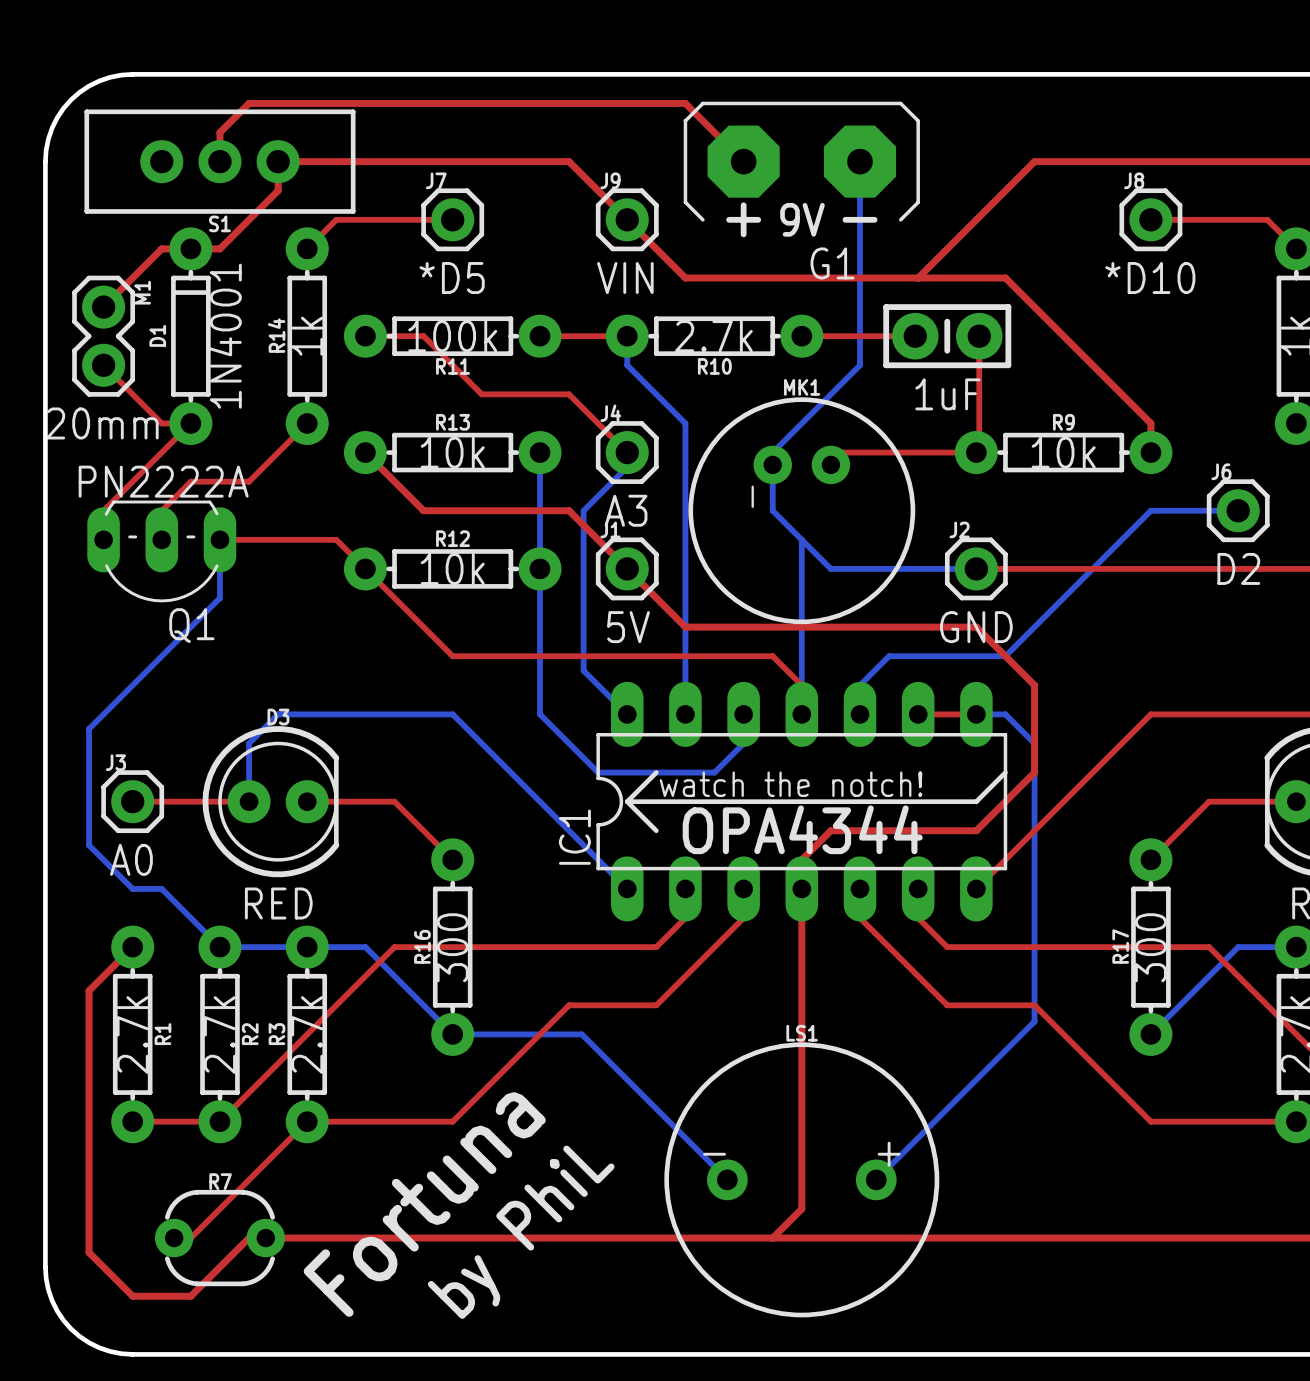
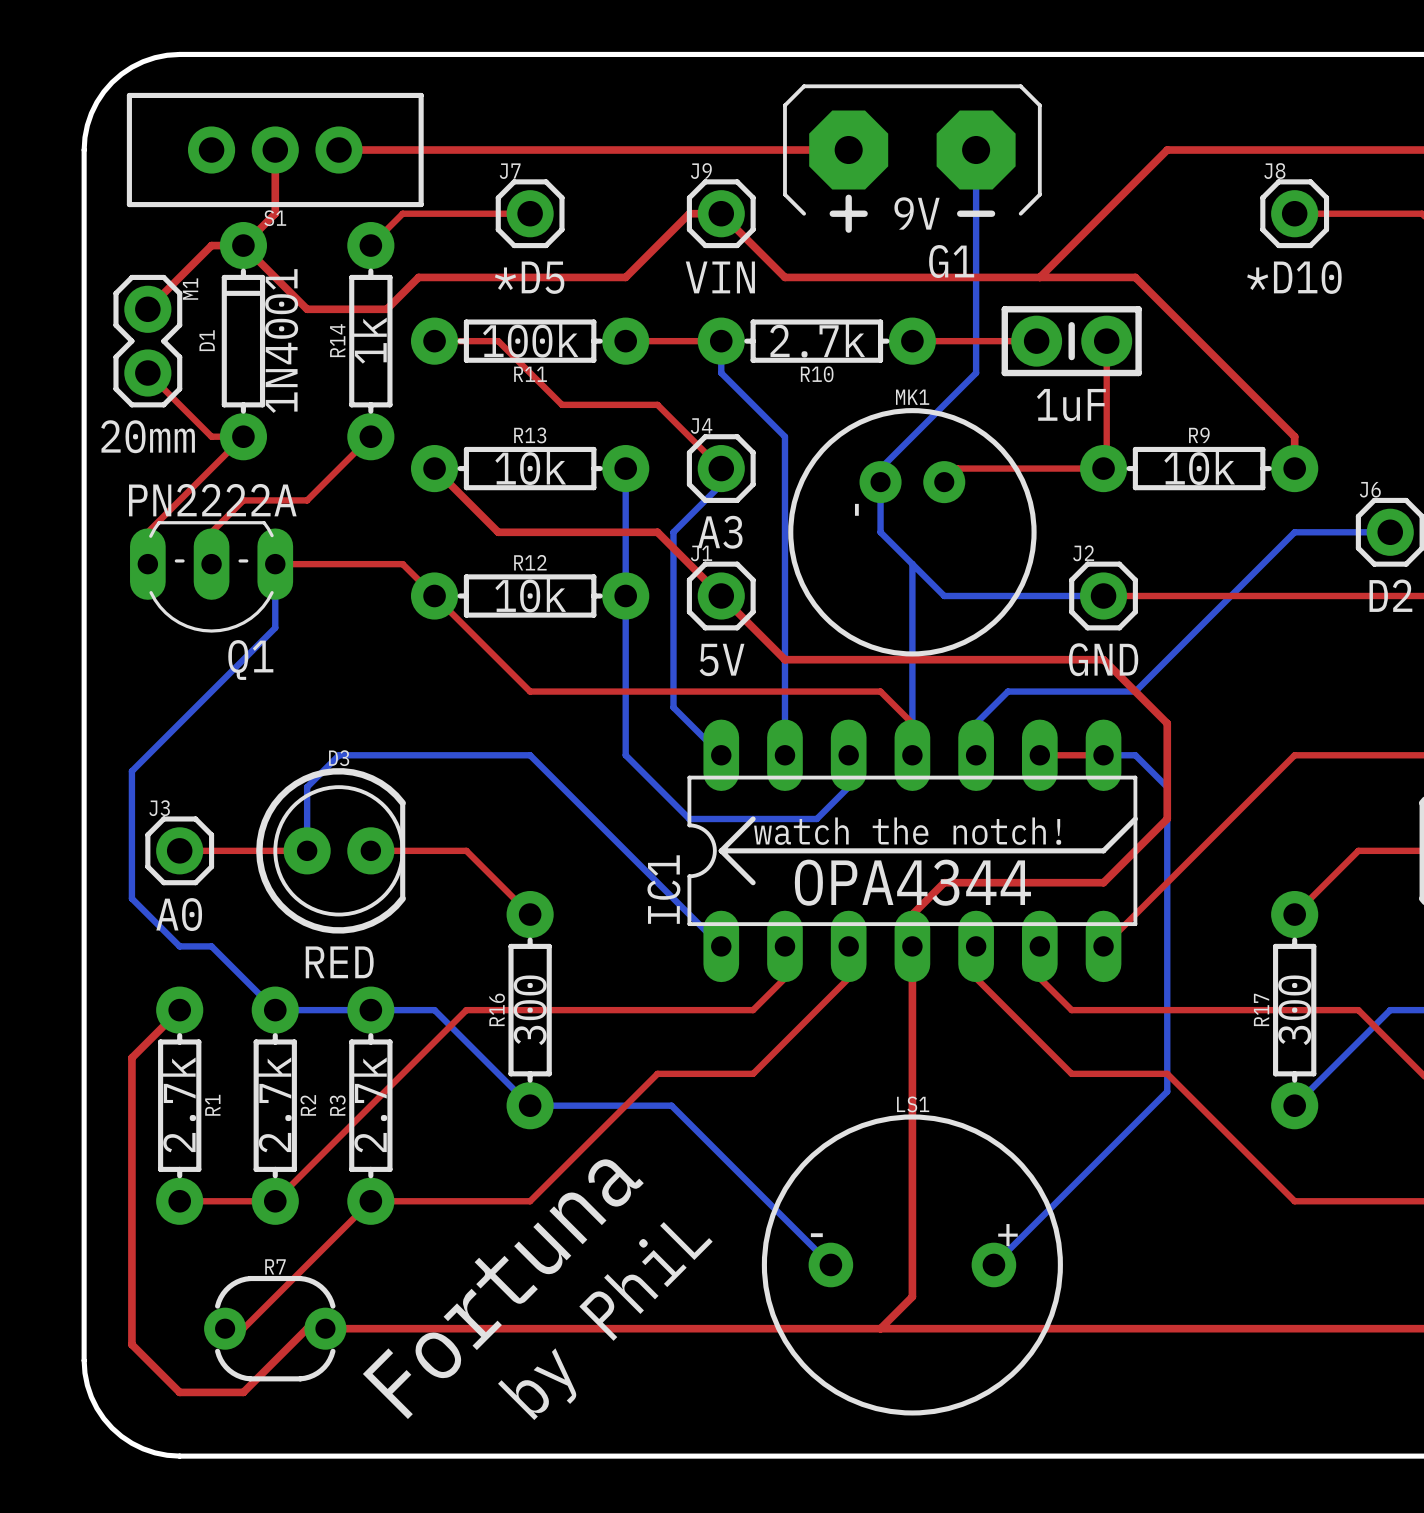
top track: (219, 161) (219, 132) (249, 103) (685, 103) (743, 161) -> (275, 150) (275, 213) (243, 245) (307, 309) (386, 309) (418, 277) (625, 277) (689, 213) (721, 213)
top track: (278, 161) (278, 190) (219, 248) (190, 248) -> none
top track: (569, 161) (627, 219) -> (657, 150) (848, 150)

